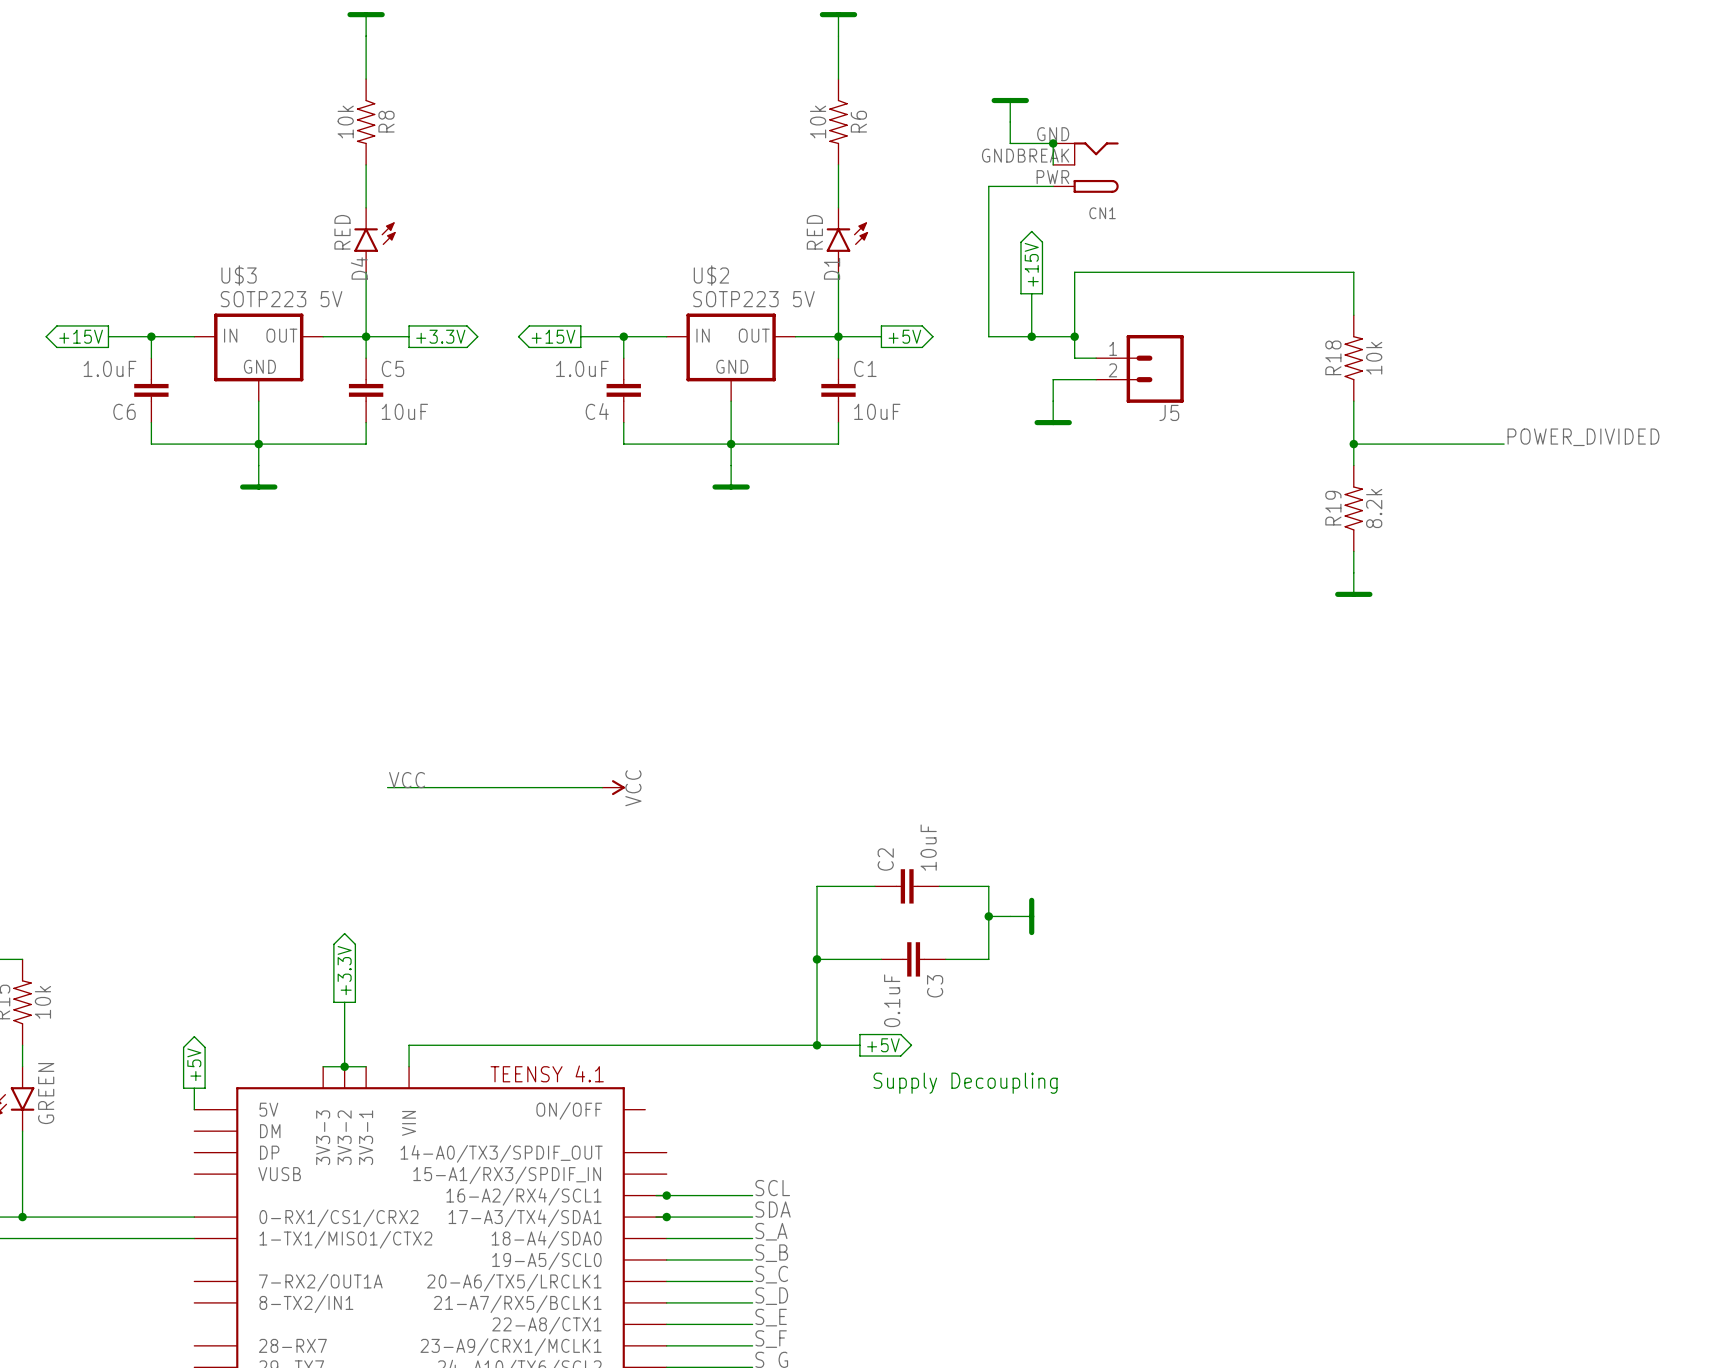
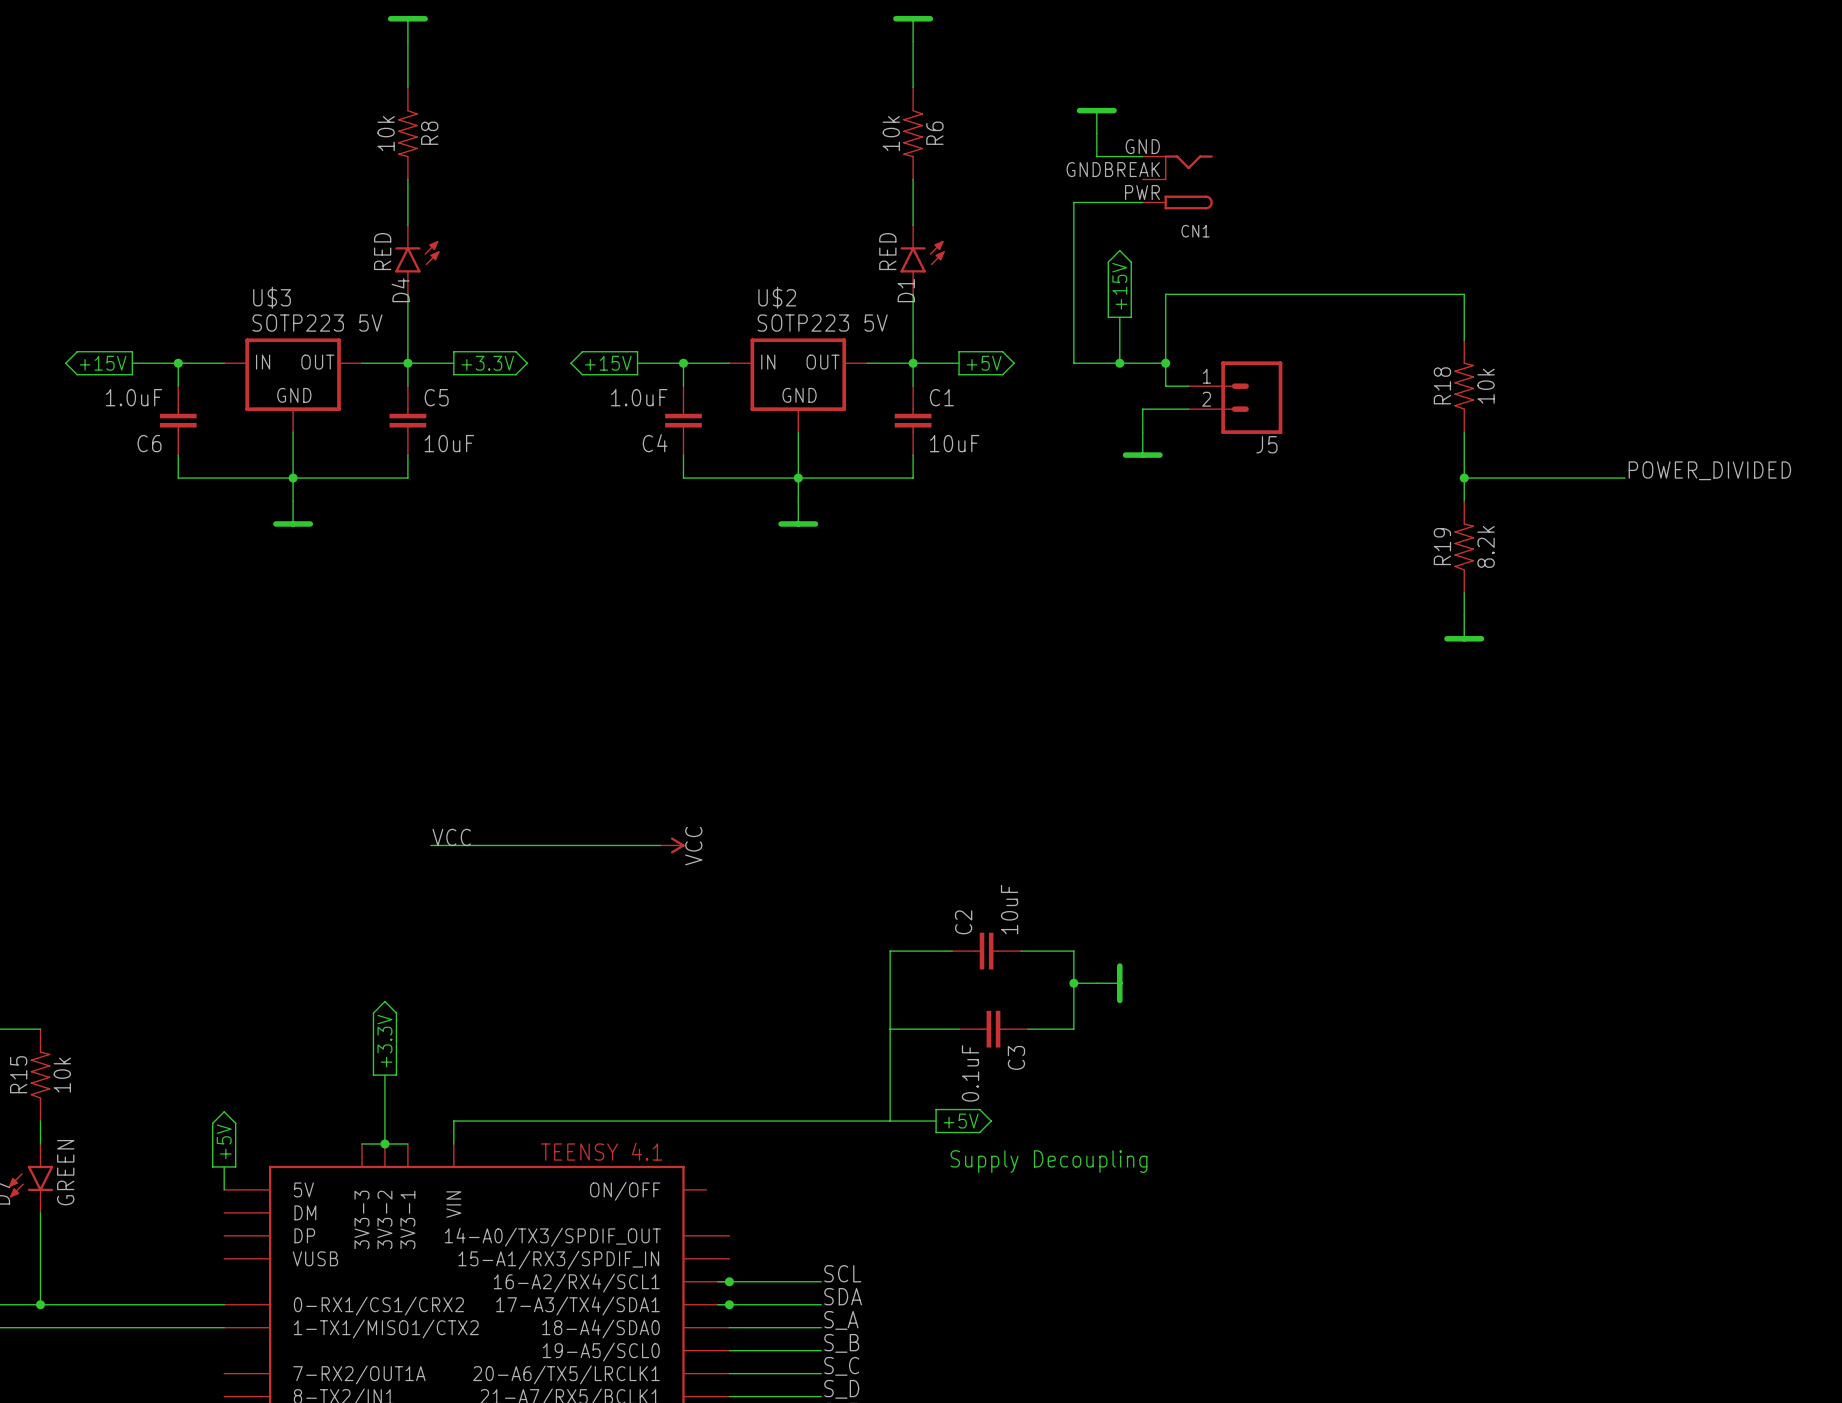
wire: (1053, 143) (1053, 164) -> none
junction: (1053, 143) -> none
junction: (817, 959) -> none
junction: (817, 1045) -> none

